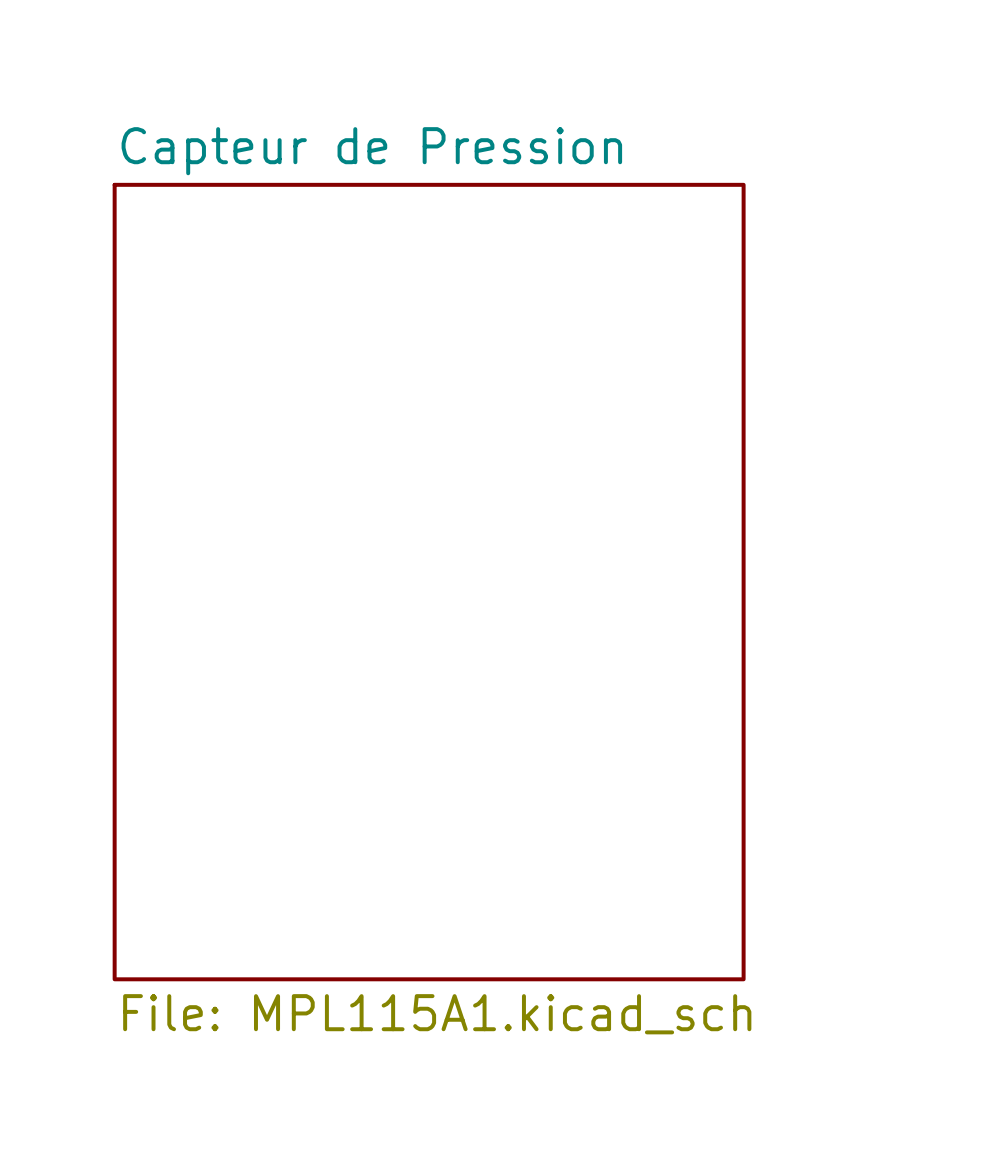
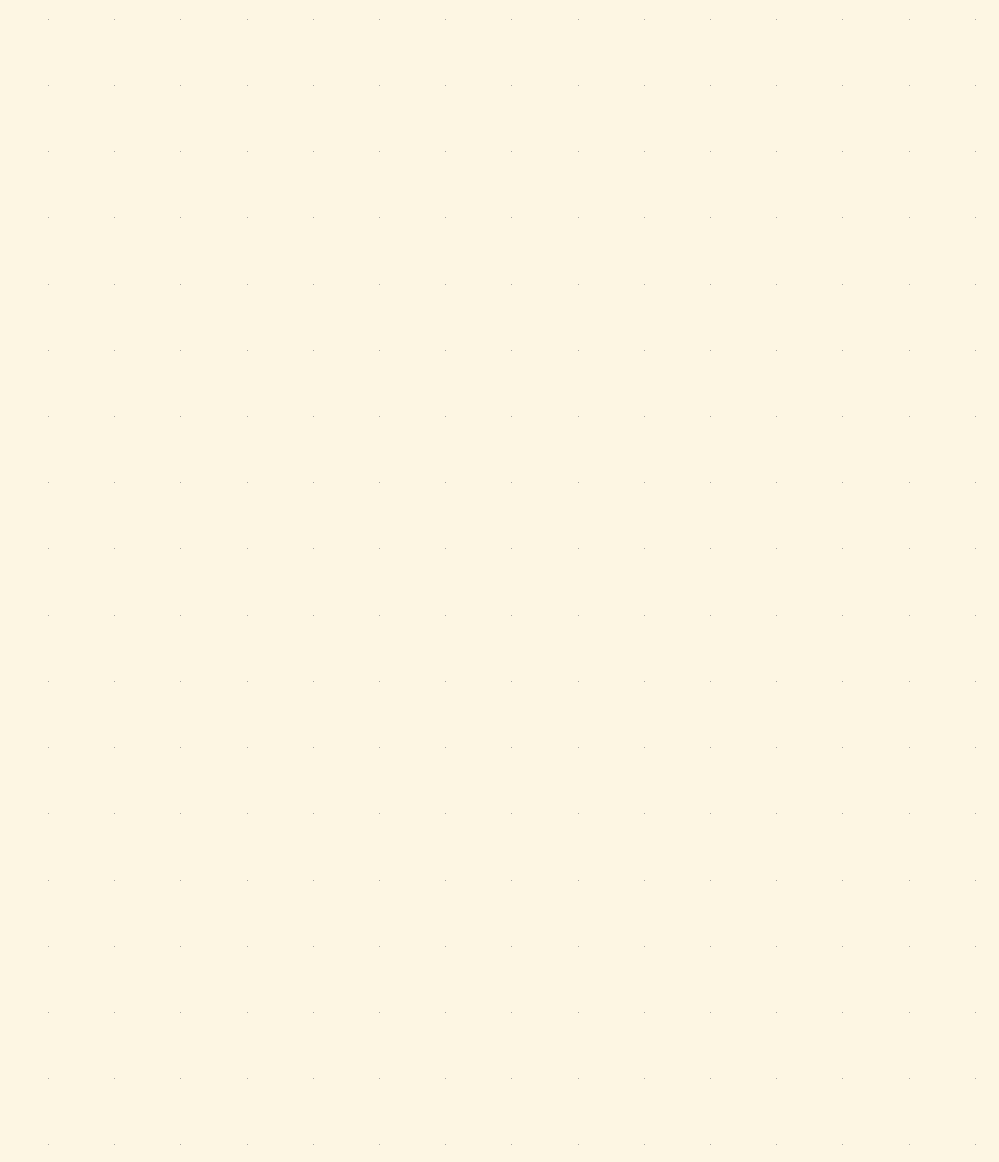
sheet Capteur de Pression: File: MPL115A1.kicad_sch (429, 582) -> none

